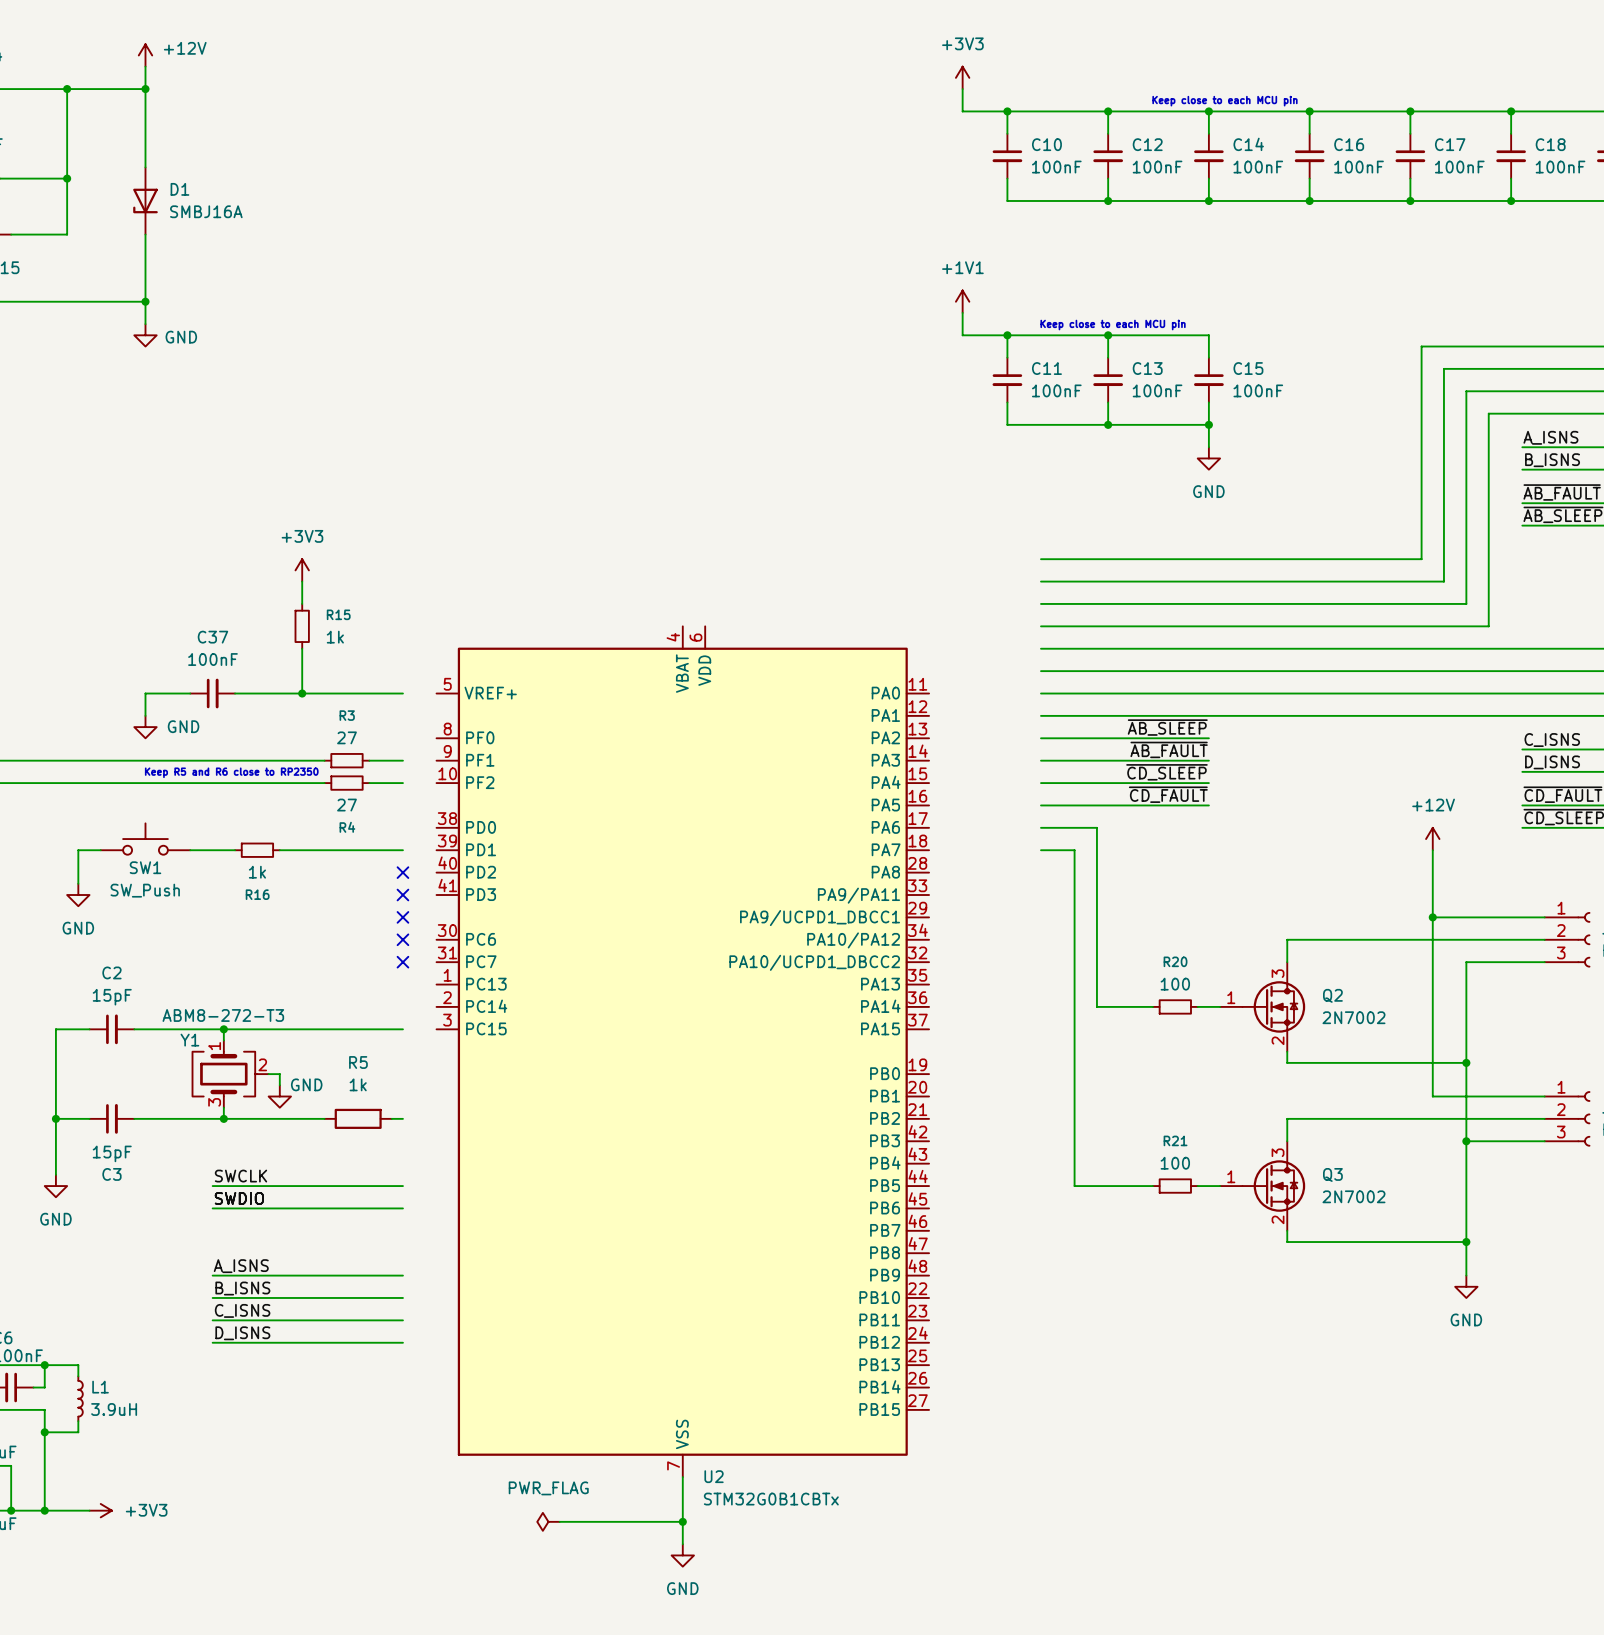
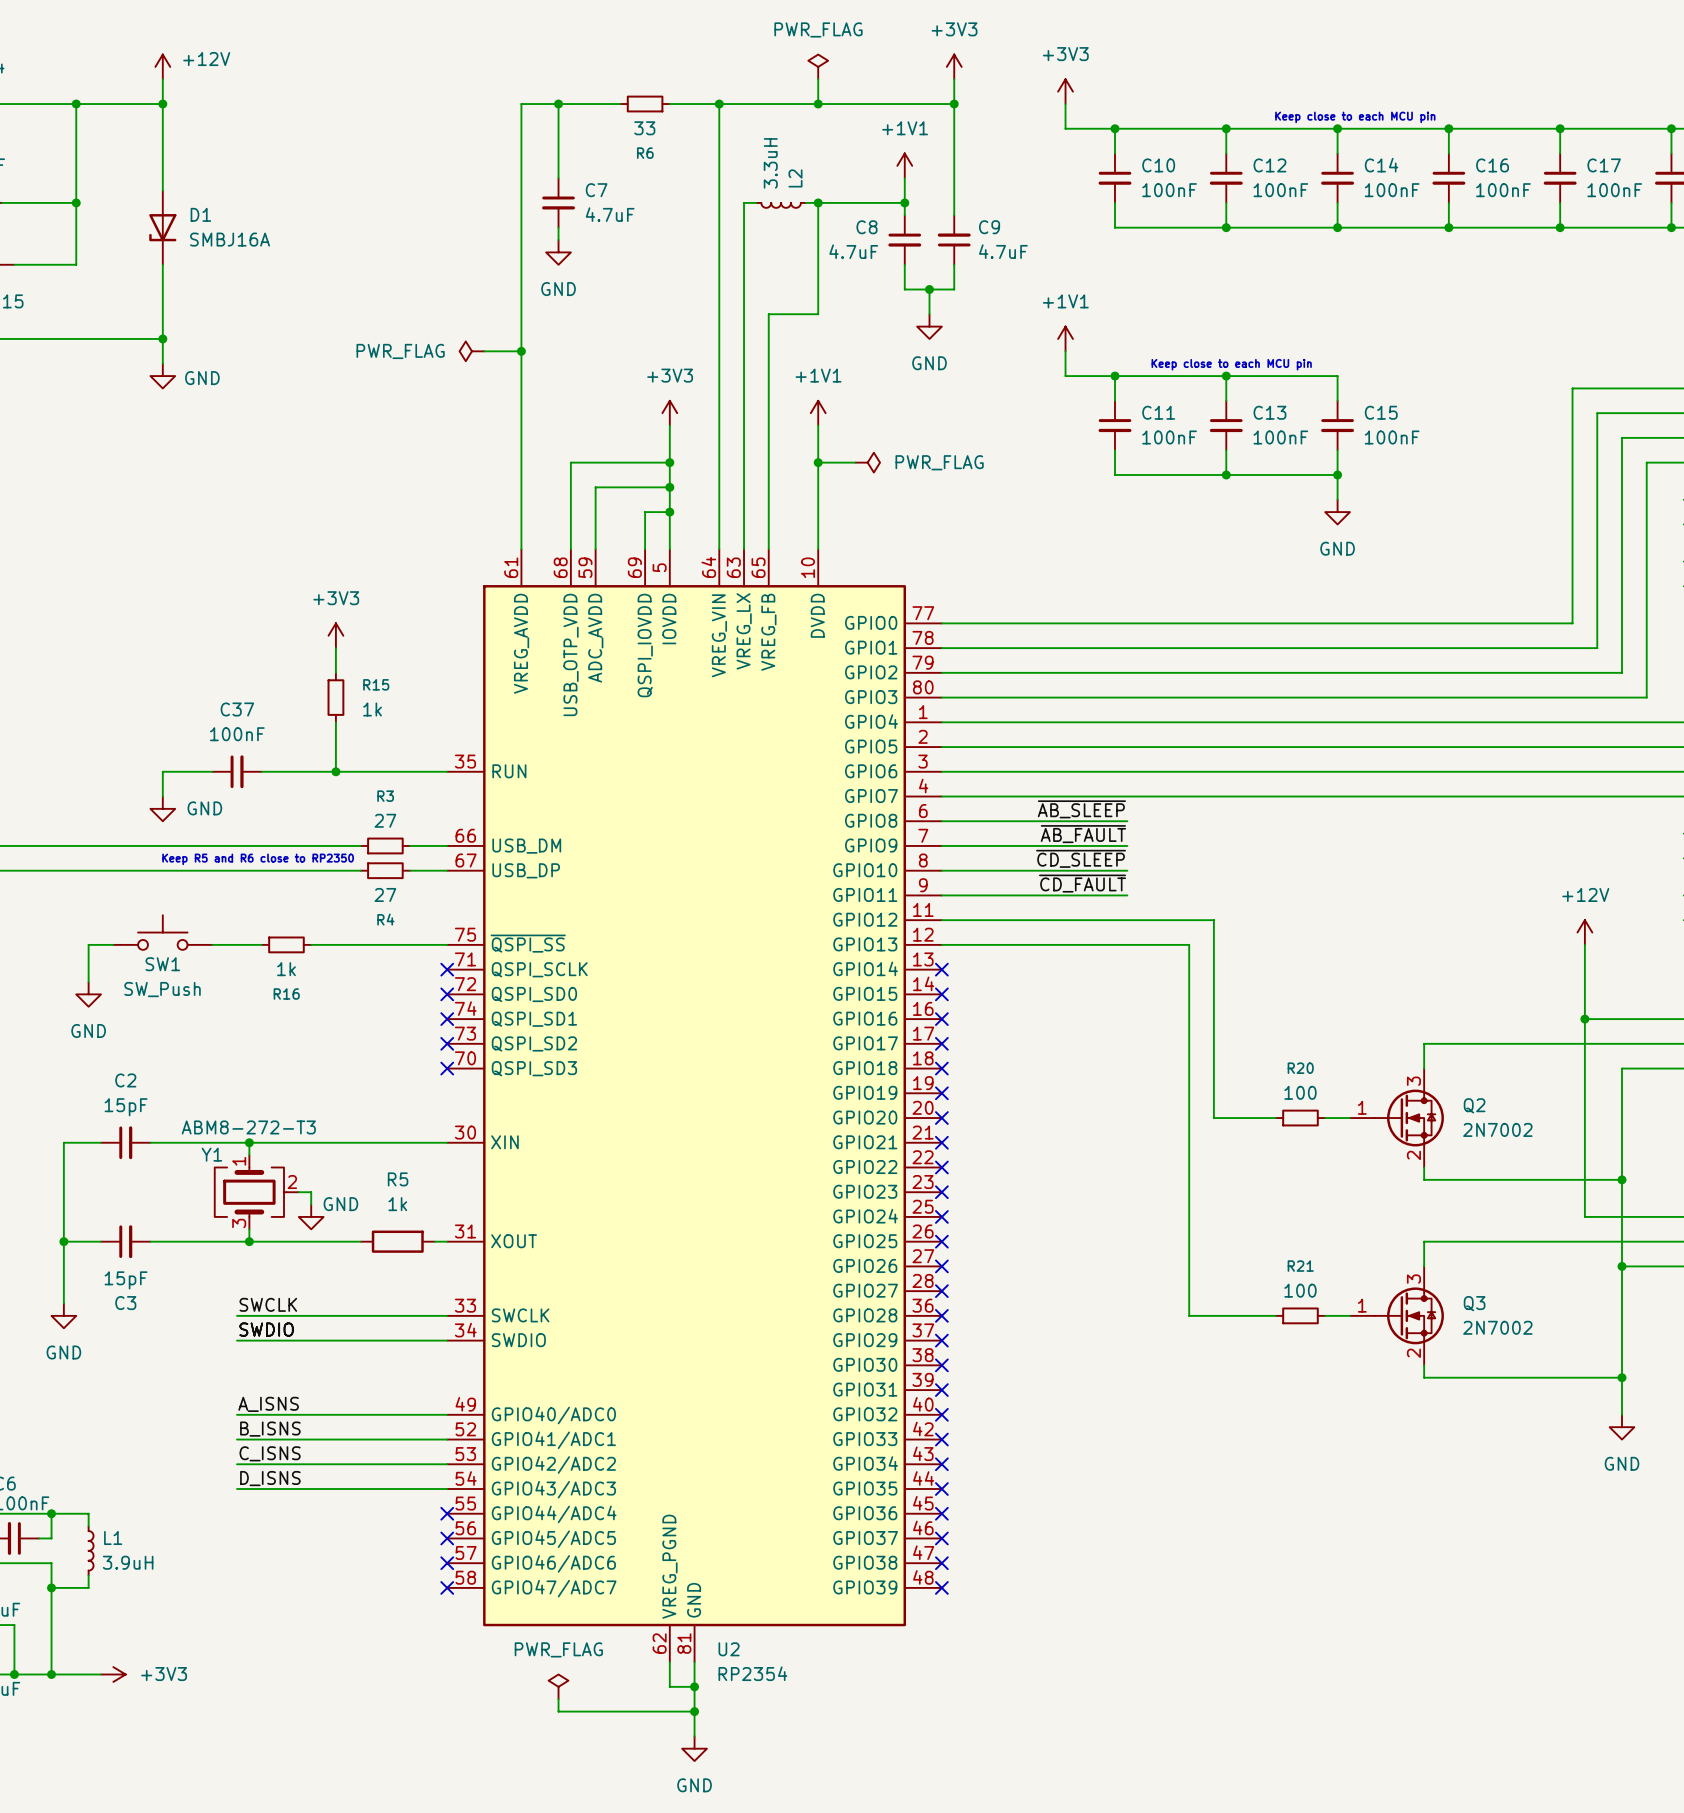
power symbol: none -> PWR_FLAG (818, 66)
power symbol: none -> +3V3 (954, 66)
wire: none -> (818, 79) (818, 104)
wire: none -> (954, 79) (954, 215)
wire: none -> (558, 104) (558, 178)
junction: none -> (558, 104)
wire: none -> (620, 104) (521, 104) (521, 549)
R6: none -> 33 (645, 104)
wire: none -> (669, 104) (954, 104)
wire: none -> (719, 104) (719, 549)
junction: none -> (719, 104)
junction: none -> (818, 104)
junction: none -> (954, 104)
power symbol: none -> +1V1 (904, 165)
wire: none -> (904, 178) (904, 215)
C7: none -> 4.7uF (558, 202)
wire: none -> (756, 202) (744, 202) (744, 549)
wire: none -> (805, 202) (904, 202)
wire: none -> (818, 202) (818, 314) (768, 314) (768, 549)
junction: none -> (818, 202)
junction: none -> (904, 202)
L2: none -> 3.3uH (781, 205)
wire: none -> (558, 227) (558, 240)
C8: none -> 4.7uF (904, 240)
C9: none -> 4.7uF (954, 240)
power symbol: none -> GND (558, 252)
wire: none -> (904, 264) (904, 289) (954, 289) (954, 264)
wire: none -> (929, 289) (929, 314)
junction: none -> (929, 289)
power symbol: none -> GND (929, 326)
power symbol: none -> PWR_FLAG (471, 351)
wire: none -> (484, 351) (521, 351)
junction: none -> (521, 351)
power symbol: none -> +3V3 (669, 413)
power symbol: none -> +1V1 (818, 413)
wire: none -> (669, 425) (669, 549)
wire: none -> (818, 425) (818, 549)
wire: none -> (669, 462) (570, 462) (570, 549)
junction: none -> (669, 462)
wire: none -> (818, 462) (855, 462)
junction: none -> (818, 462)
power symbol: none -> PWR_FLAG (867, 462)
wire: none -> (669, 487) (595, 487) (595, 549)
junction: none -> (669, 487)
wire: none -> (669, 512) (645, 512) (645, 549)
junction: none -> (669, 512)
wire: none -> (941, 623) (1152, 623)
wire: none -> (941, 648) (1152, 648)
wire: none -> (941, 672) (1152, 672)
U2 symbol: [436, 626, 930, 1478] -> [447, 549, 942, 1663]
wire: none -> (941, 697) (1152, 697)
wire: none -> (941, 722) (1152, 722)
wire: none -> (941, 747) (1152, 747)
wire: none -> (941, 771) (1152, 771)
wire: none -> (941, 796) (1152, 796)
label position: ~{AB_SLEEP} (1167, 727) -> ~{AB_SLEEP} (1081, 809)
wire: (1041, 738) (1208, 738) -> (941, 821) (1127, 821)
label position: ~{AB_FAULT} (1169, 749) -> ~{AB_FAULT} (1083, 834)
wire: (1041, 760) (1208, 760) -> (941, 845) (1127, 845)
label position: ~{CD_SLEEP} (1166, 772) -> ~{CD_SLEEP} (1081, 858)
wire: (1041, 783) (1208, 783) -> (941, 870) (1127, 870)
label position: ~{CD_FAULT} (1168, 794) -> ~{CD_FAULT} (1082, 883)
wire: (1041, 805) (1208, 805) -> (941, 895) (1127, 895)
wire: none -> (941, 920) (1152, 920)
wire: none -> (941, 944) (1152, 944)
no-connect mark: none -> (941, 969)
no-connect mark: none -> (941, 994)
no-connect mark: none -> (941, 1019)
no-connect mark: none -> (941, 1043)
no-connect mark: none -> (941, 1068)
no-connect mark: none -> (941, 1093)
no-connect mark: none -> (941, 1118)
no-connect mark: none -> (941, 1142)
no-connect mark: none -> (941, 1167)
no-connect mark: none -> (941, 1192)
no-connect mark: none -> (941, 1216)
no-connect mark: none -> (941, 1241)
no-connect mark: none -> (941, 1266)
no-connect mark: none -> (941, 1291)
no-connect mark: none -> (941, 1315)
no-connect mark: none -> (941, 1340)
no-connect mark: none -> (941, 1365)
no-connect mark: none -> (941, 1390)
no-connect mark: none -> (941, 1414)
no-connect mark: none -> (941, 1439)
no-connect mark: none -> (941, 1464)
no-connect mark: none -> (941, 1489)
no-connect mark: none -> (447, 1513)
no-connect mark: none -> (941, 1513)
no-connect mark: none -> (447, 1538)
no-connect mark: none -> (941, 1538)
no-connect mark: none -> (447, 1563)
no-connect mark: none -> (941, 1563)
no-connect mark: none -> (447, 1587)
no-connect mark: none -> (941, 1587)
U2 name position: U2 (714, 1476) -> U2 (729, 1649)
wire: (682, 1477) (682, 1544) -> (694, 1662) (694, 1736)
U2 value: STM32G0B1CBTx (771, 1499) -> RP2354 (752, 1673)
power symbol rotation: 0° (548, 1521) -> 90° clockwise (558, 1686)
power symbol position: PWR_FLAG (548, 1521) -> PWR_FLAG (558, 1686)
wire: (559, 1521) (604, 1521) -> (669, 1662) (669, 1686)
wire: (626, 1521) (682, 1521) -> none
junction: none -> (694, 1686)
junction: (682, 1521) -> none
wire: none -> (558, 1699) (558, 1711) (694, 1711)
junction: none -> (694, 1711)
power symbol position: GND (682, 1555) -> GND (694, 1748)

